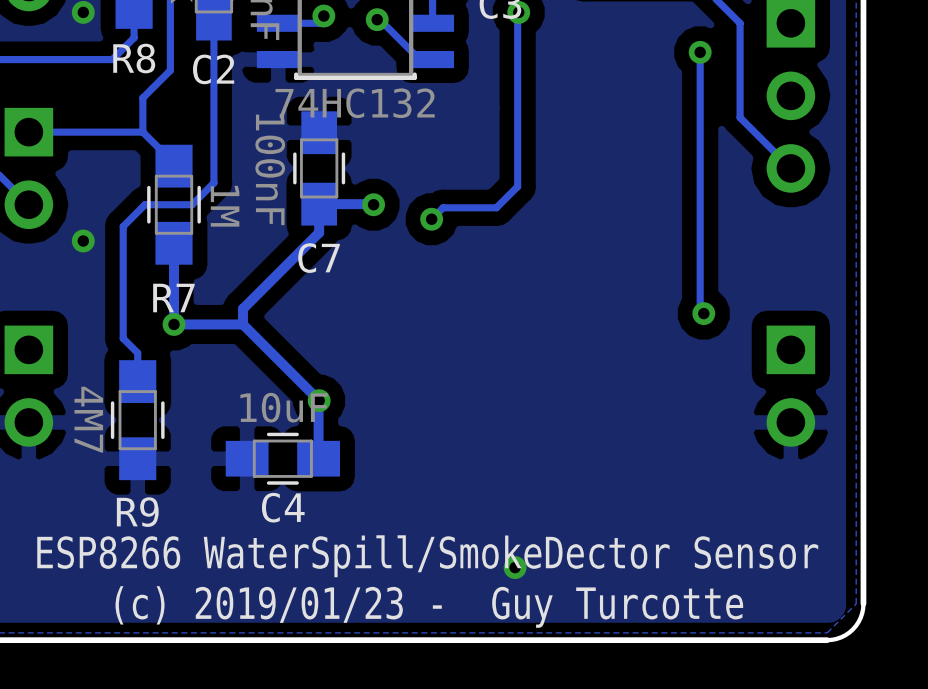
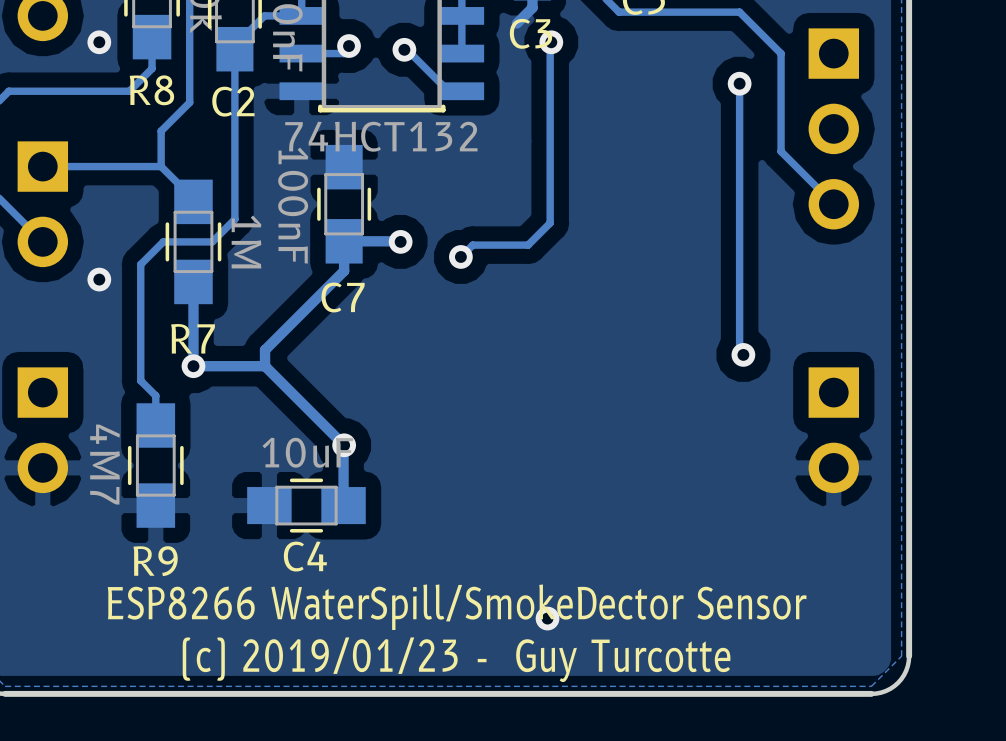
part value: 74HC132 (355, 103) -> 74HCT132 (381, 136)

